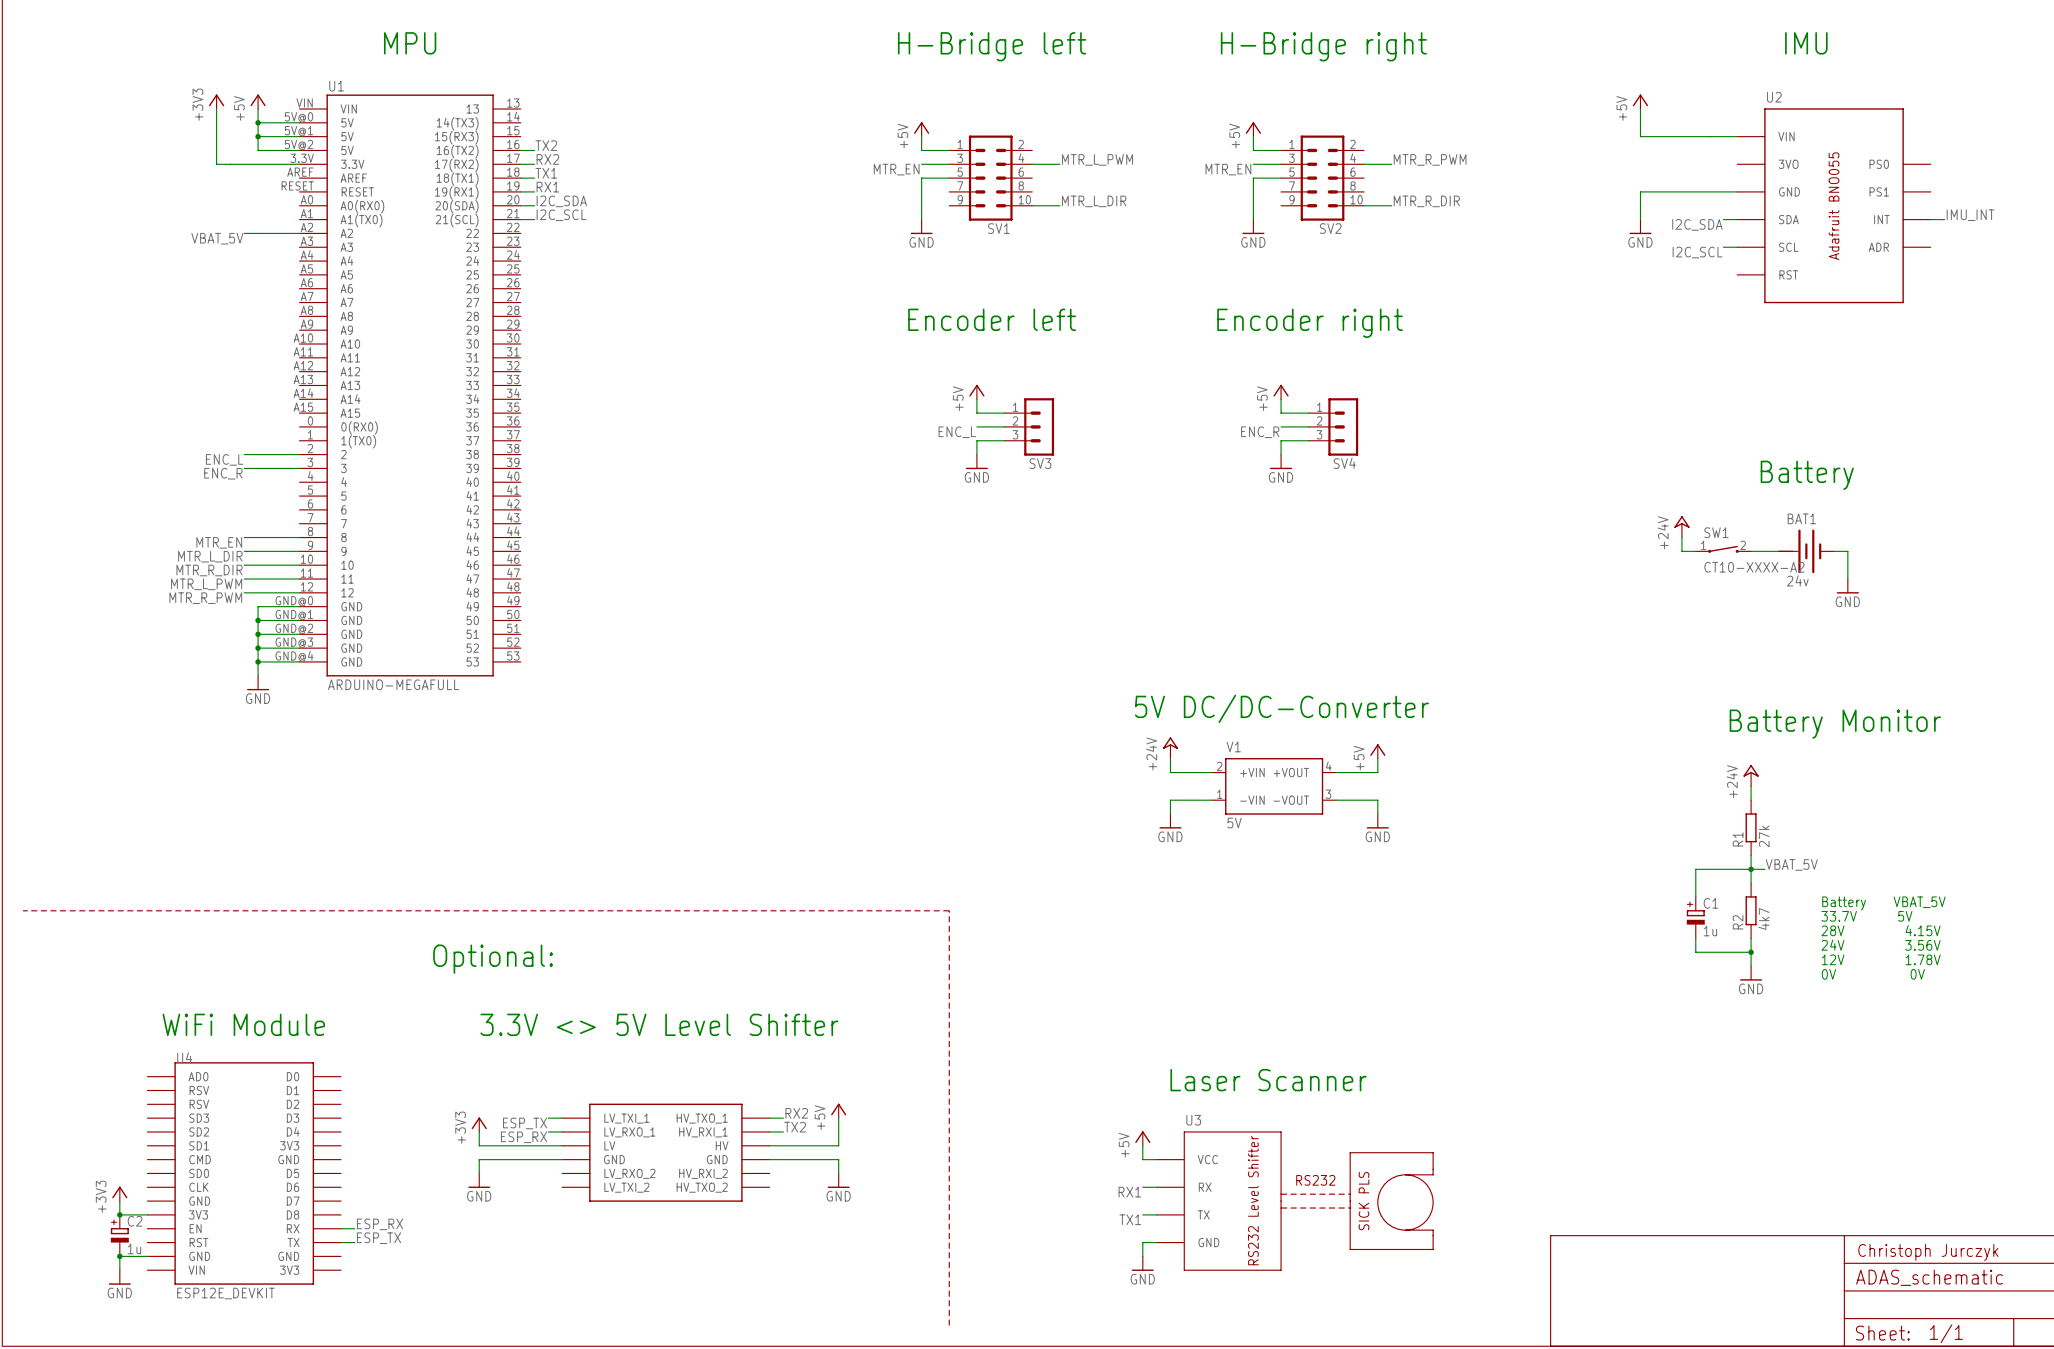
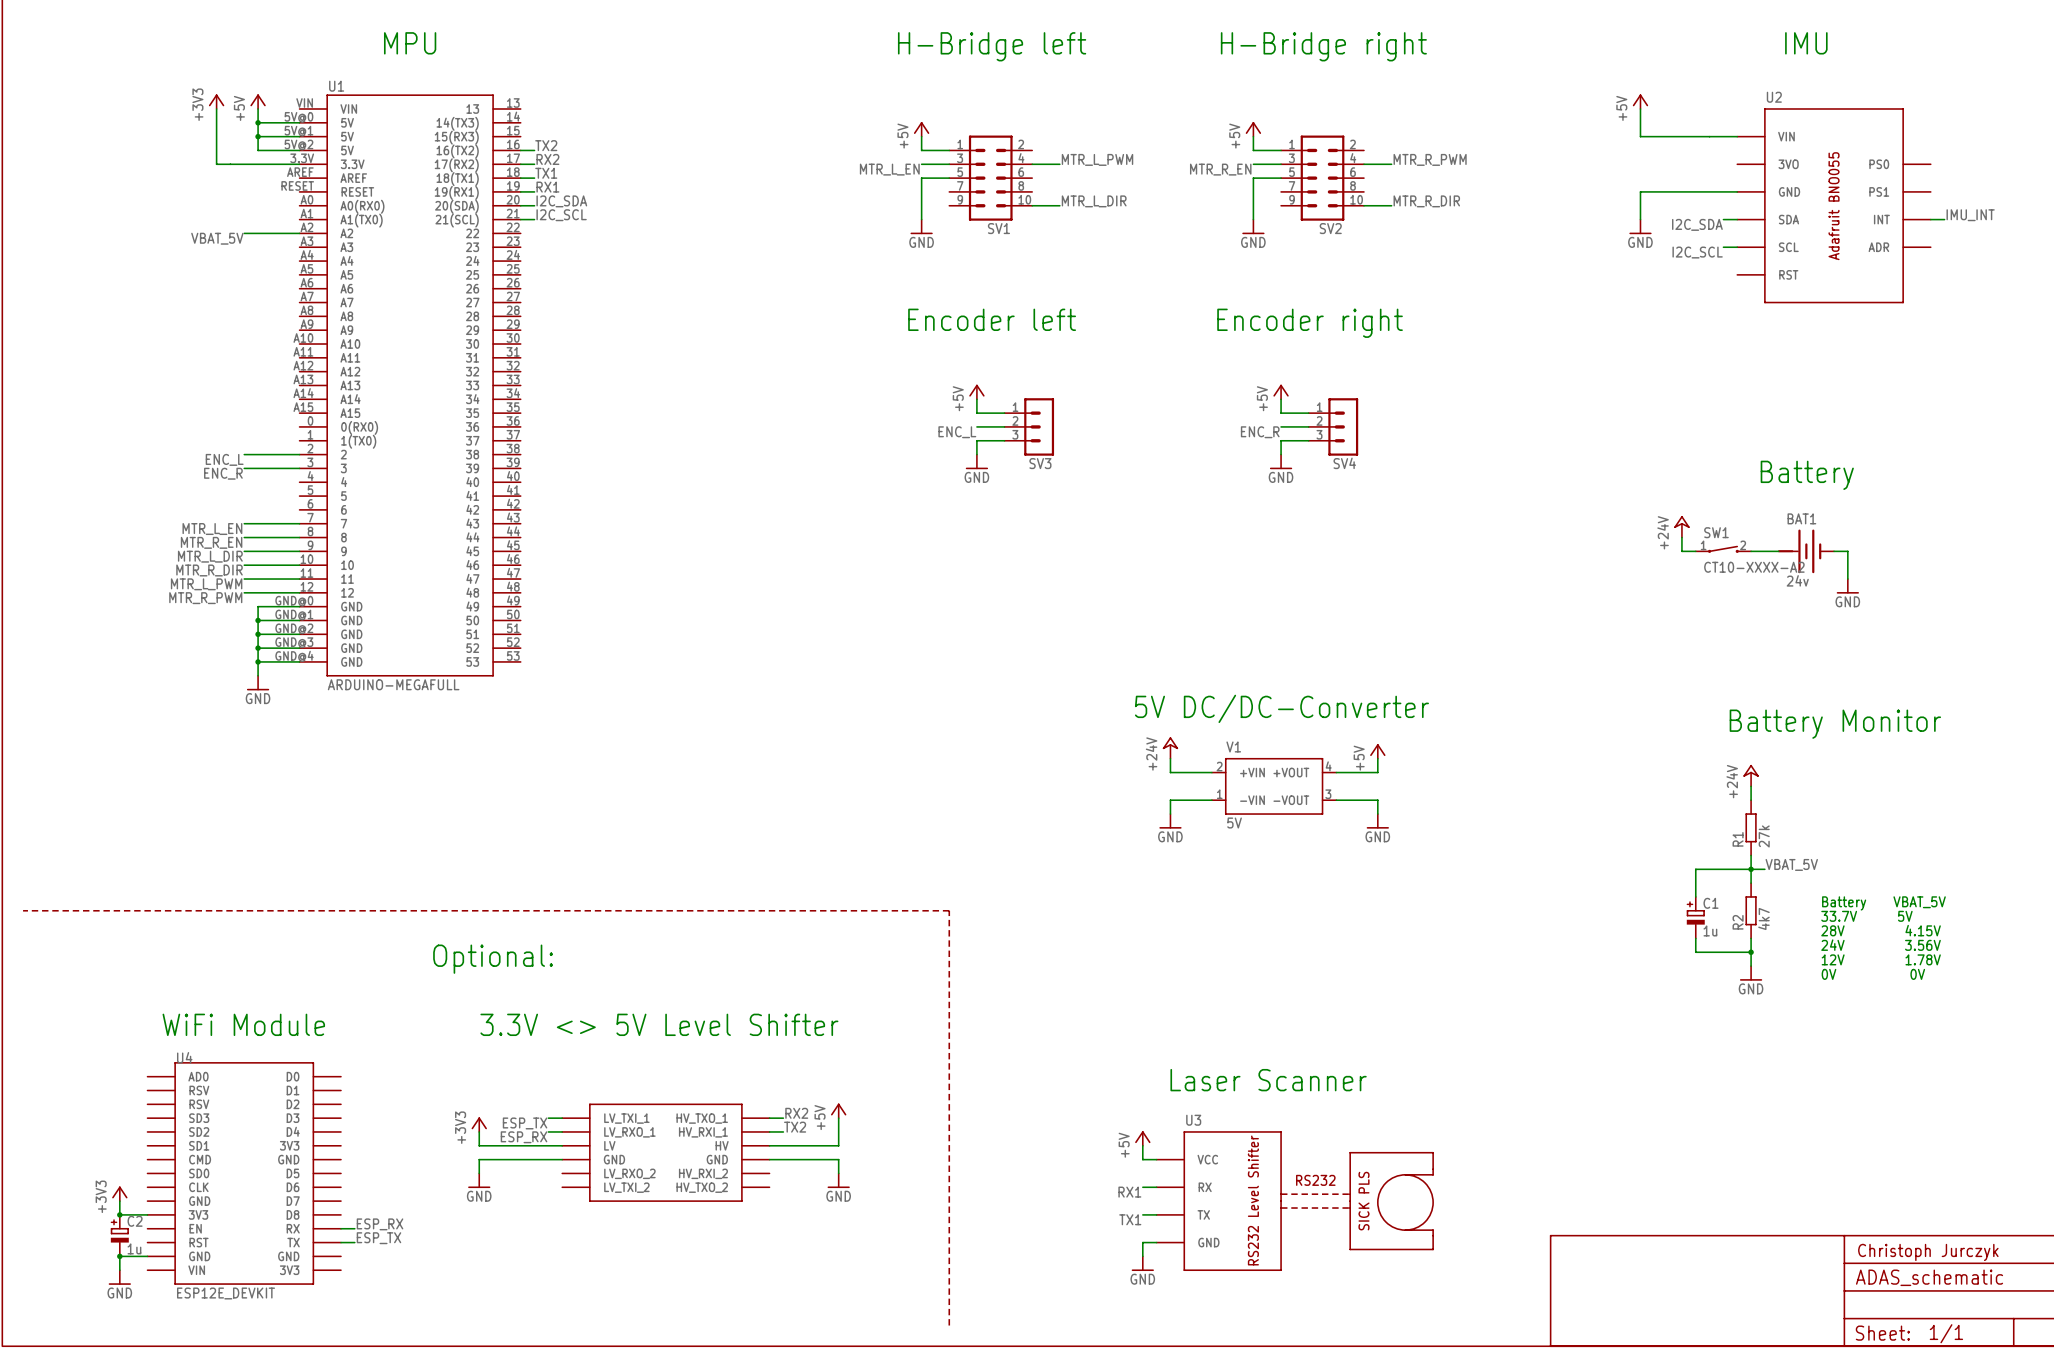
label: MTR_EN (896, 169) -> MTR_L_EN (889, 169)
label: MTR_EN (1228, 169) -> MTR_R_EN (1220, 169)
wire: none -> (244, 523) (299, 523)
label: none -> MTR_L_EN (212, 529)
label: MTR_EN (219, 542) -> MTR_R_EN (211, 542)

